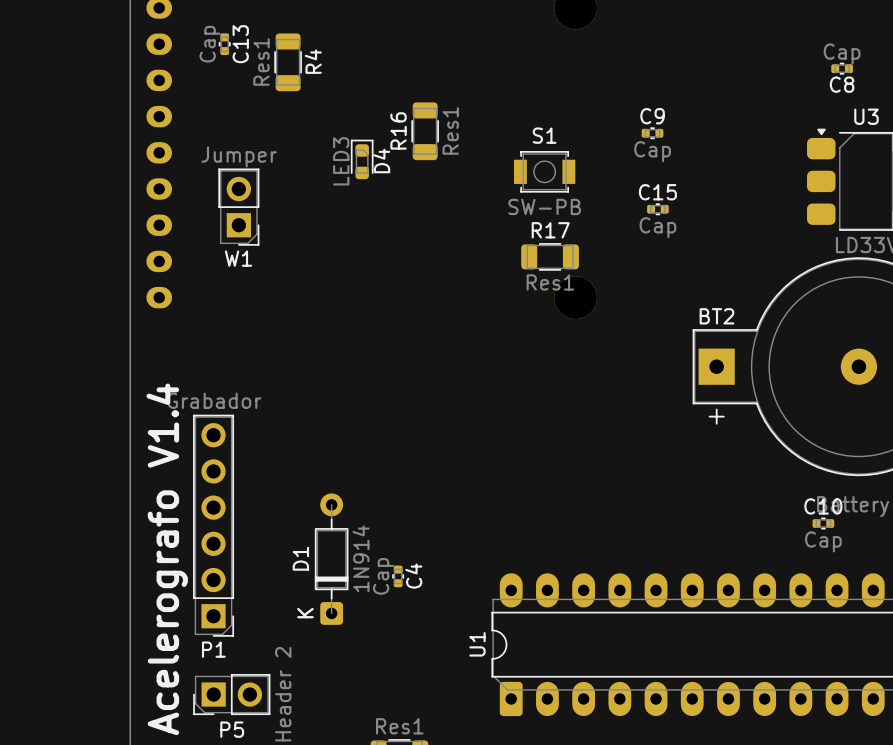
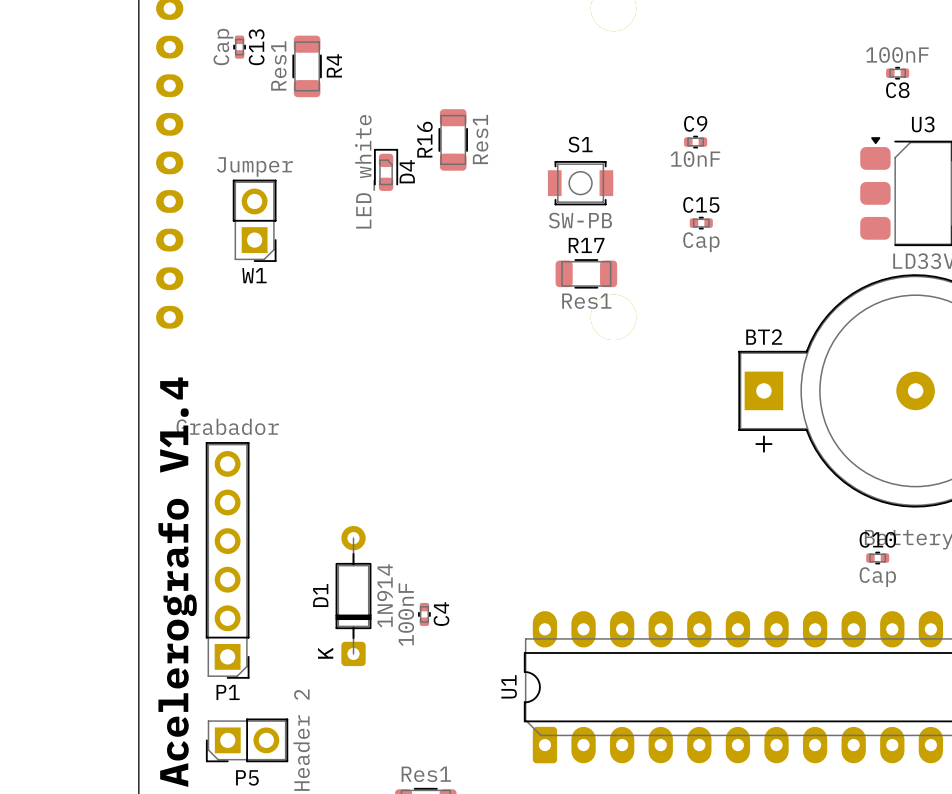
C8 value: Cap (842, 53) -> 100nF (897, 54)
C9 value: Cap (652, 151) -> 10nF (695, 159)
D4 value: LED3 (341, 161) -> LED_white (365, 171)
C4 value: Cap (383, 576) -> 100nF (406, 614)

